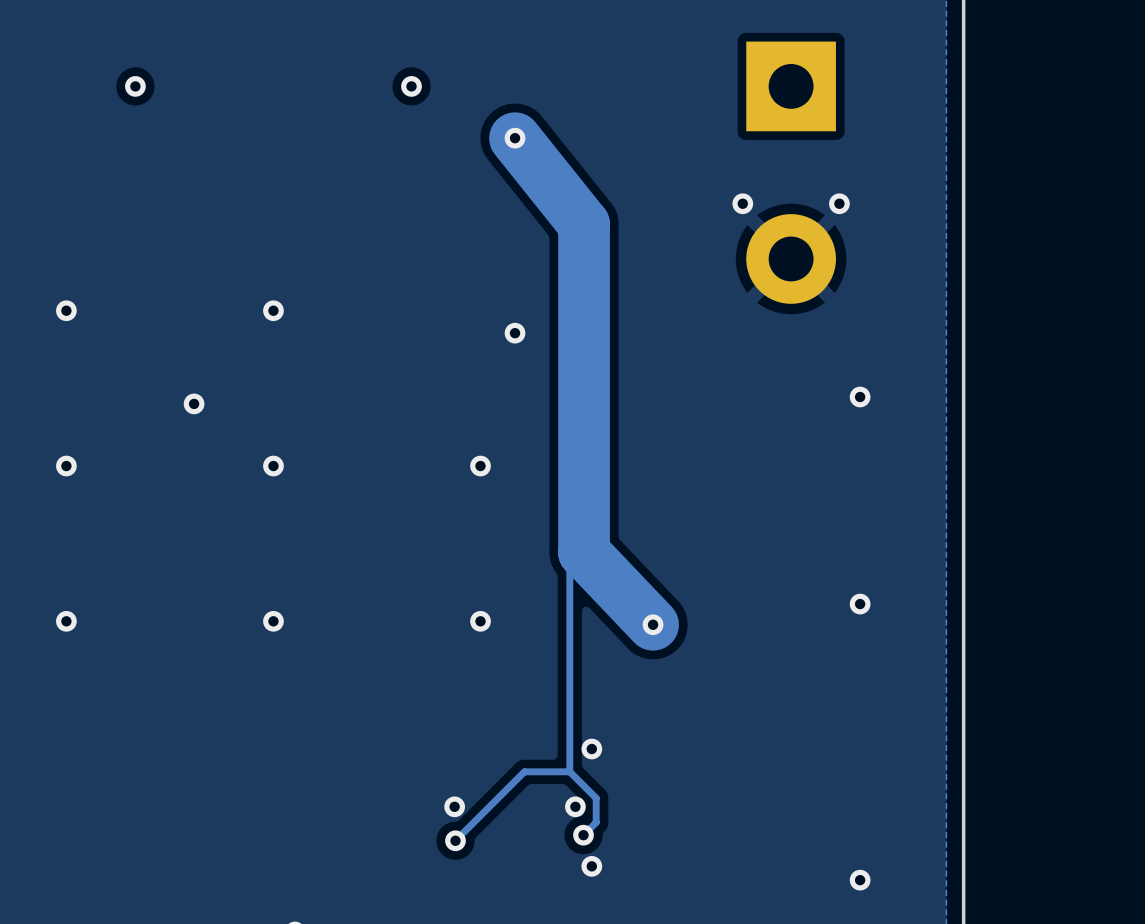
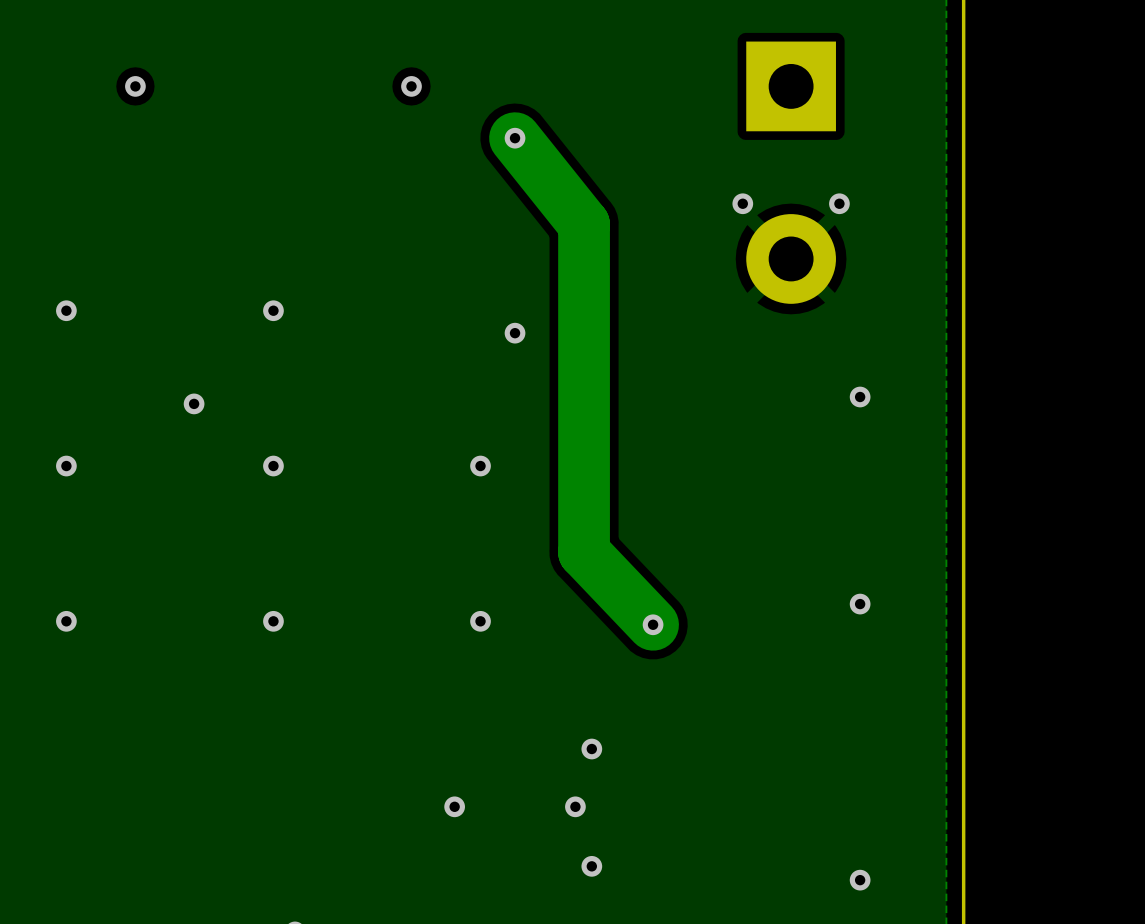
track: (584, 552) (569, 566) (569, 771) -> none
track: (569, 771) (524, 771) (455, 840) -> none
track: (569, 771) (596, 798) (596, 822) (583, 835) -> none
via: (583, 835) -> none
via: (455, 840) -> none

